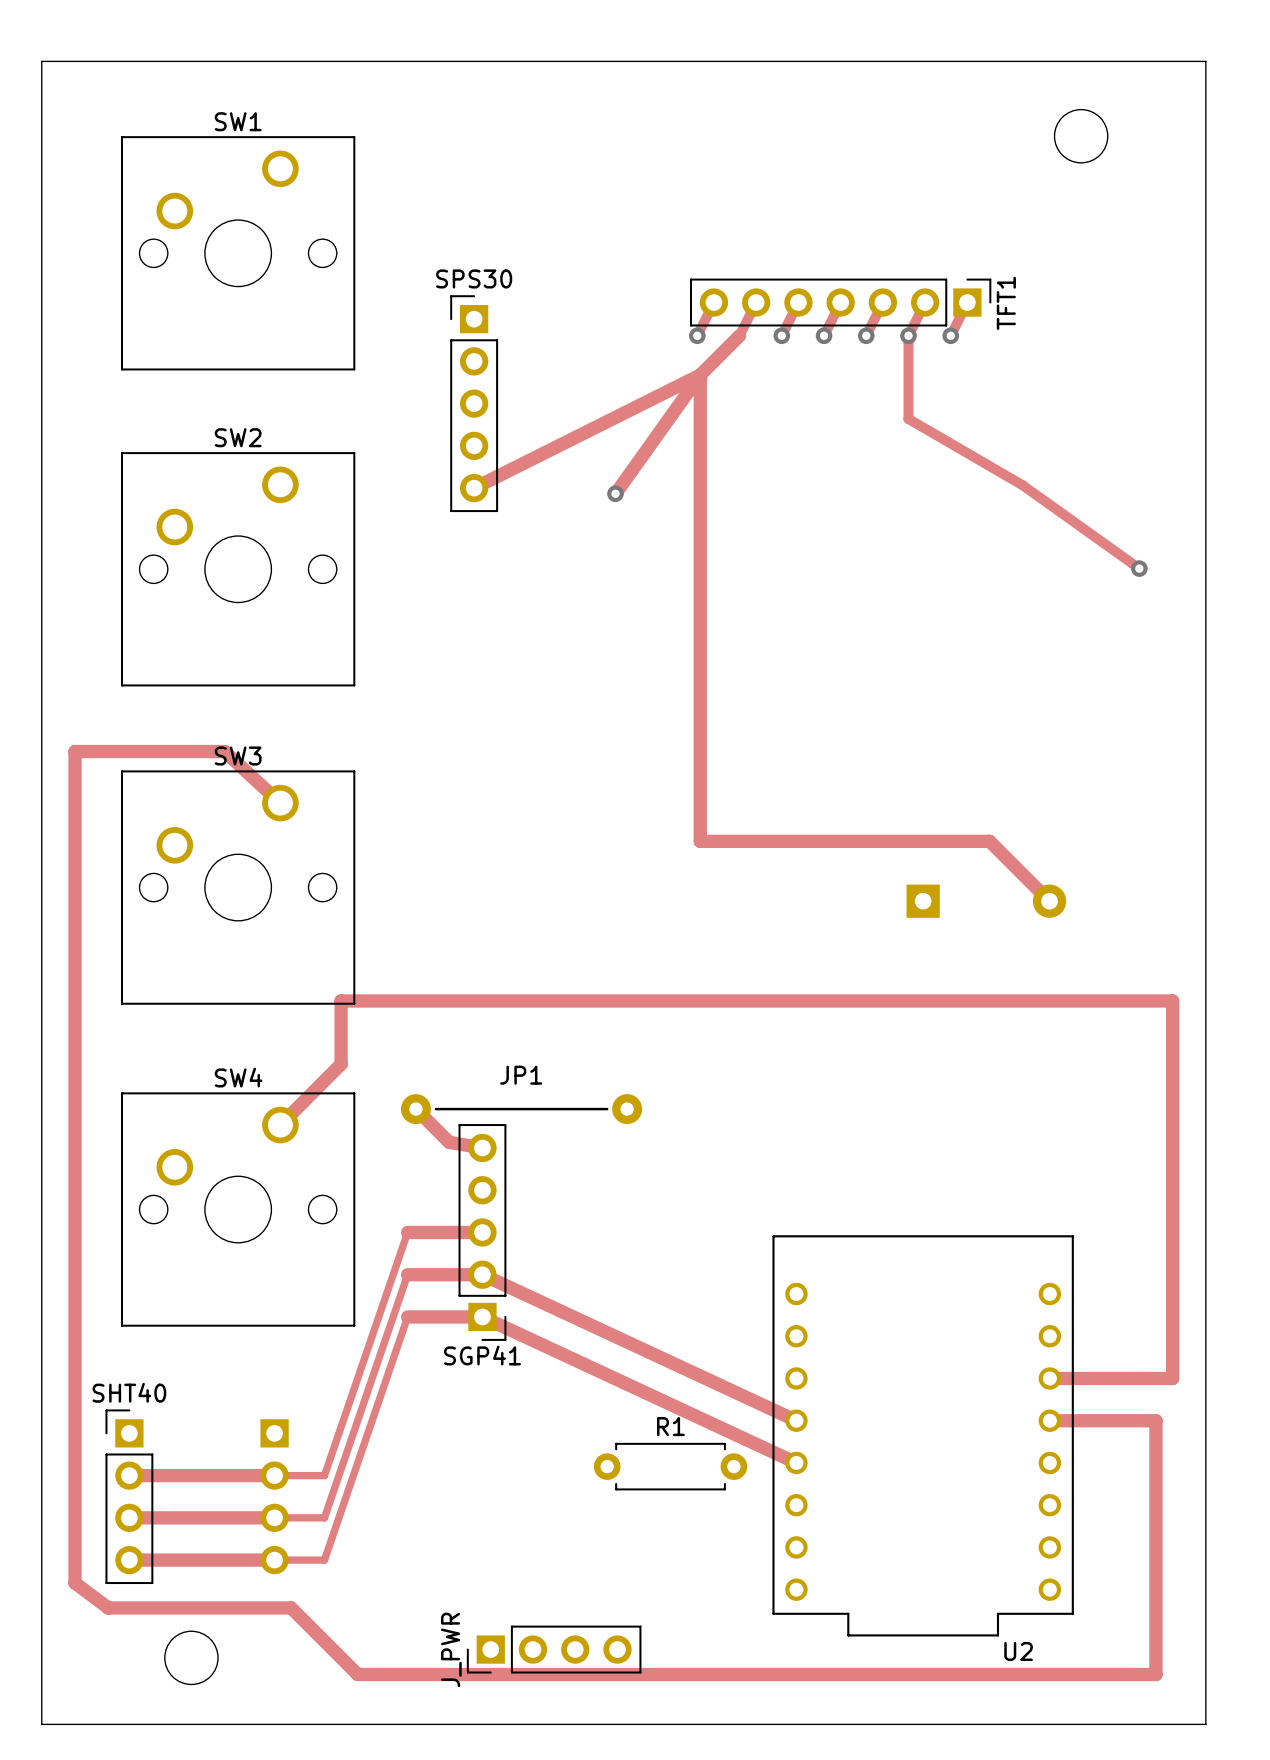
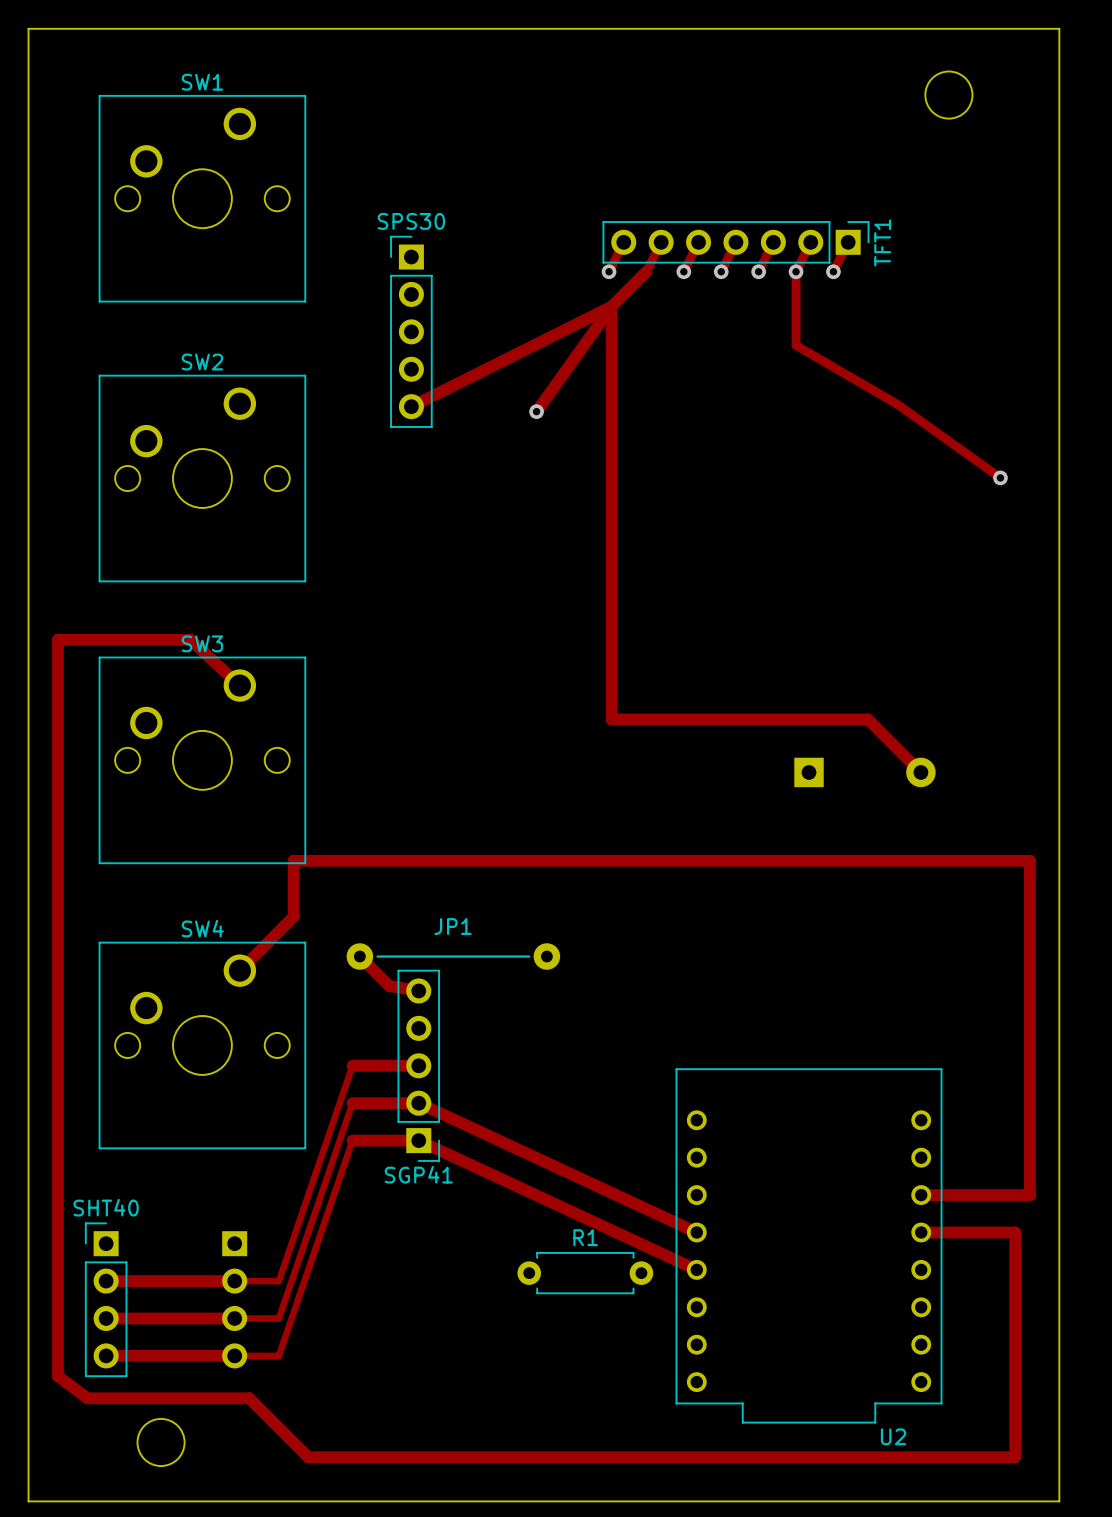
J_PWR: (554, 1649) -> none

